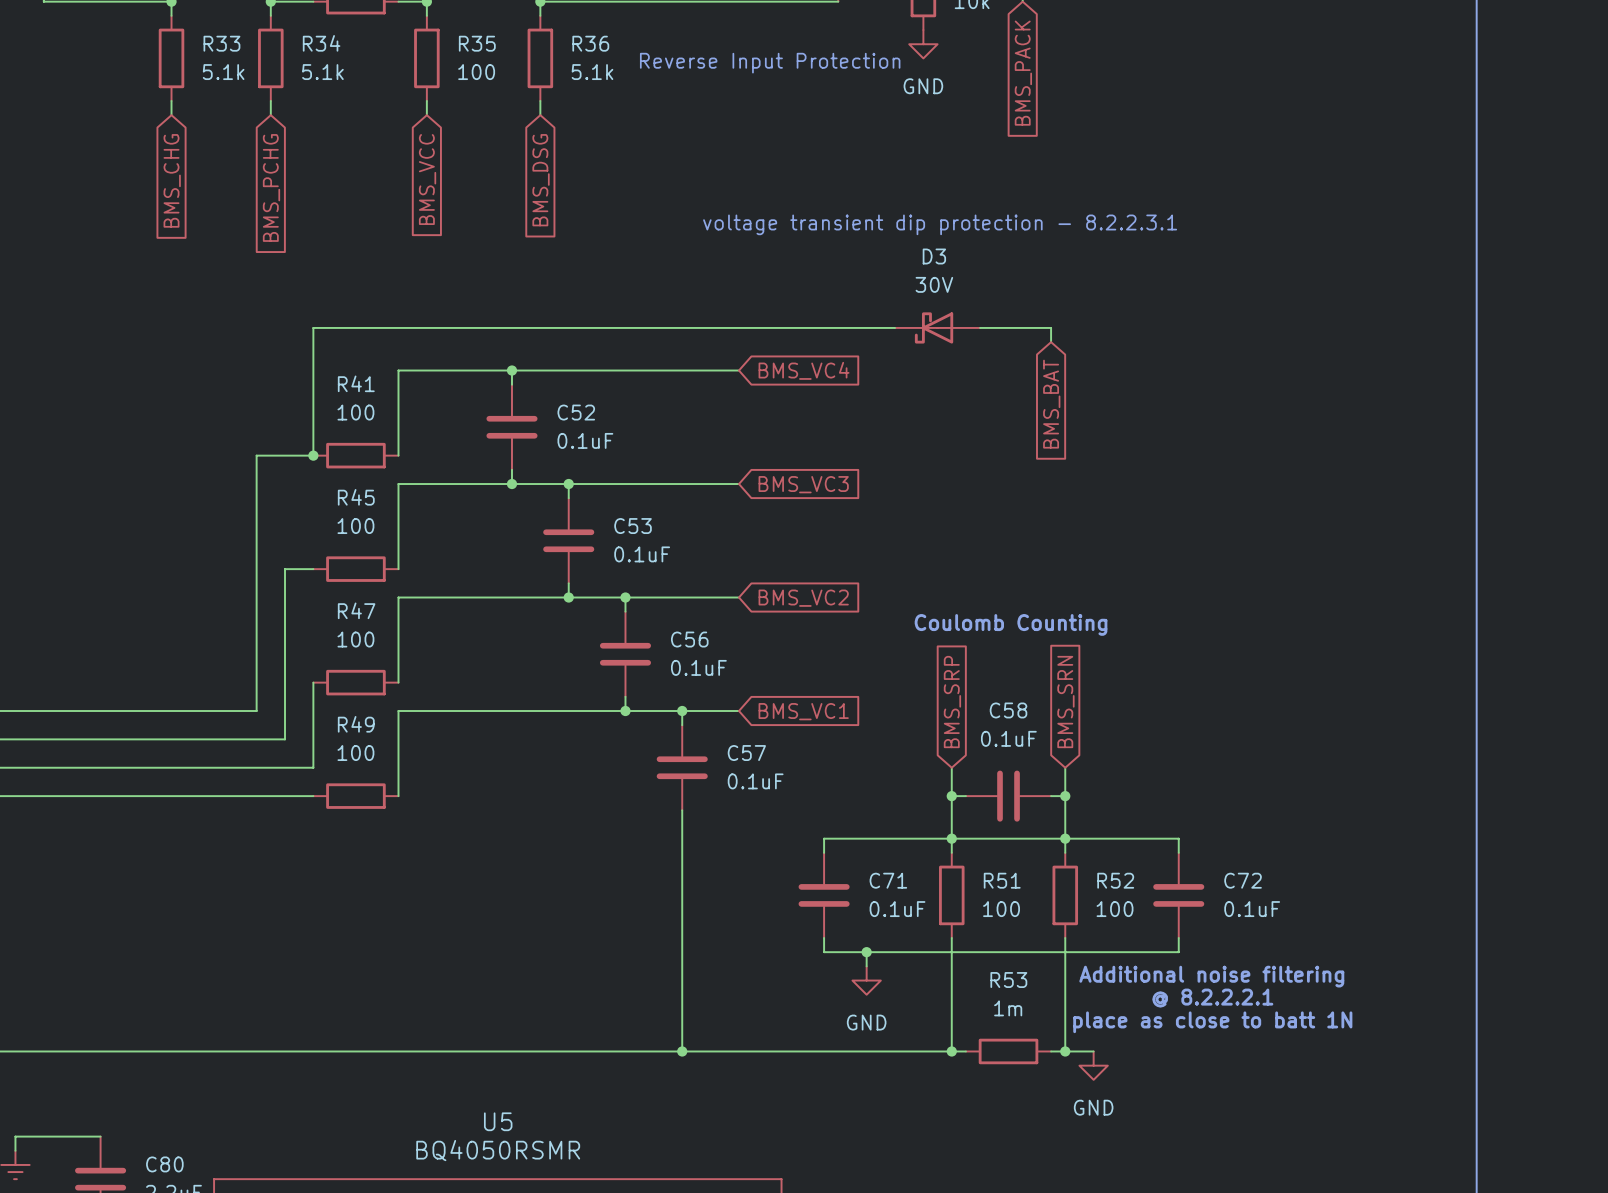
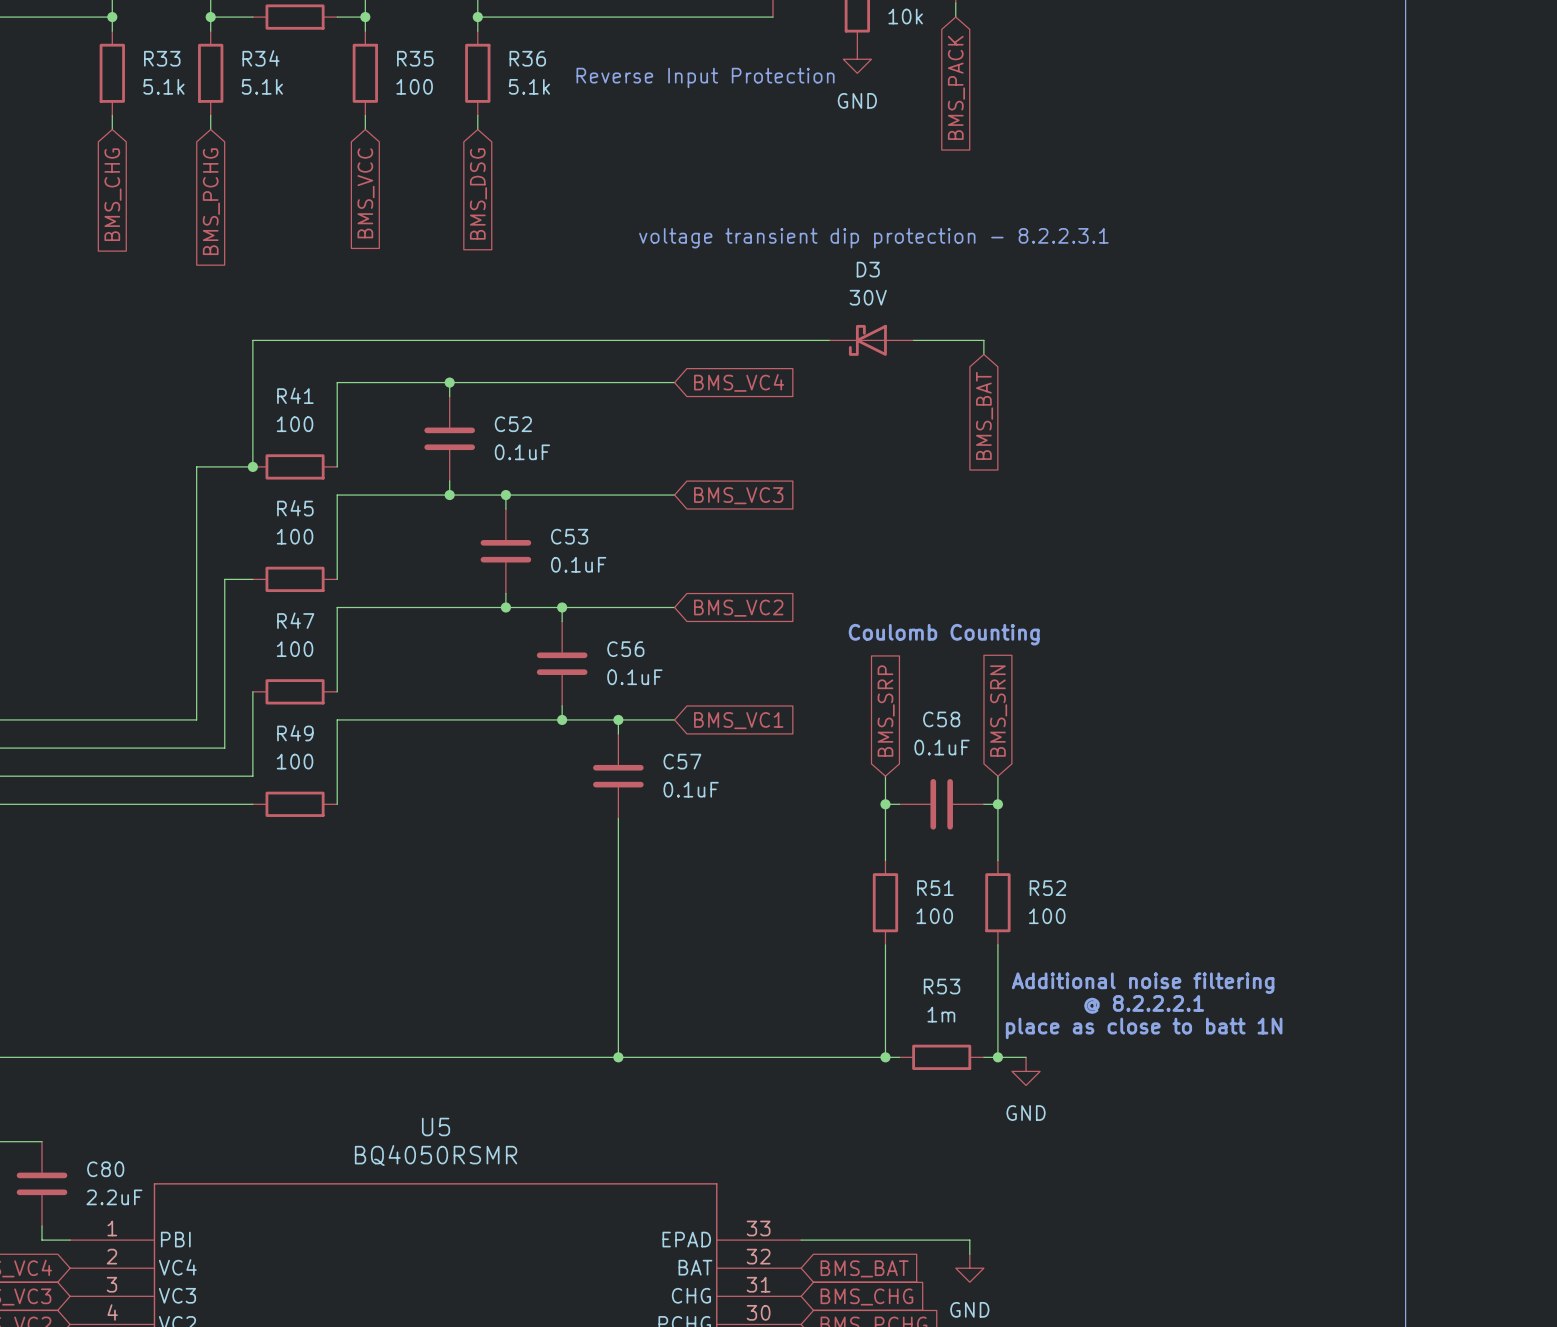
junction: (951, 838) -> none
junction: (1065, 838) -> none
wire: (824, 852) (824, 838) (1178, 838) (1178, 852) -> none
C71: 0.1uF (824, 895) -> none
C72: 0.1uF (1178, 895) -> none
wire: (824, 937) (824, 952) (1178, 952) (1178, 937) -> none
wire: (866, 952) (866, 966) -> none
junction: (866, 952) -> none
power symbol: GND (866, 980) -> none

